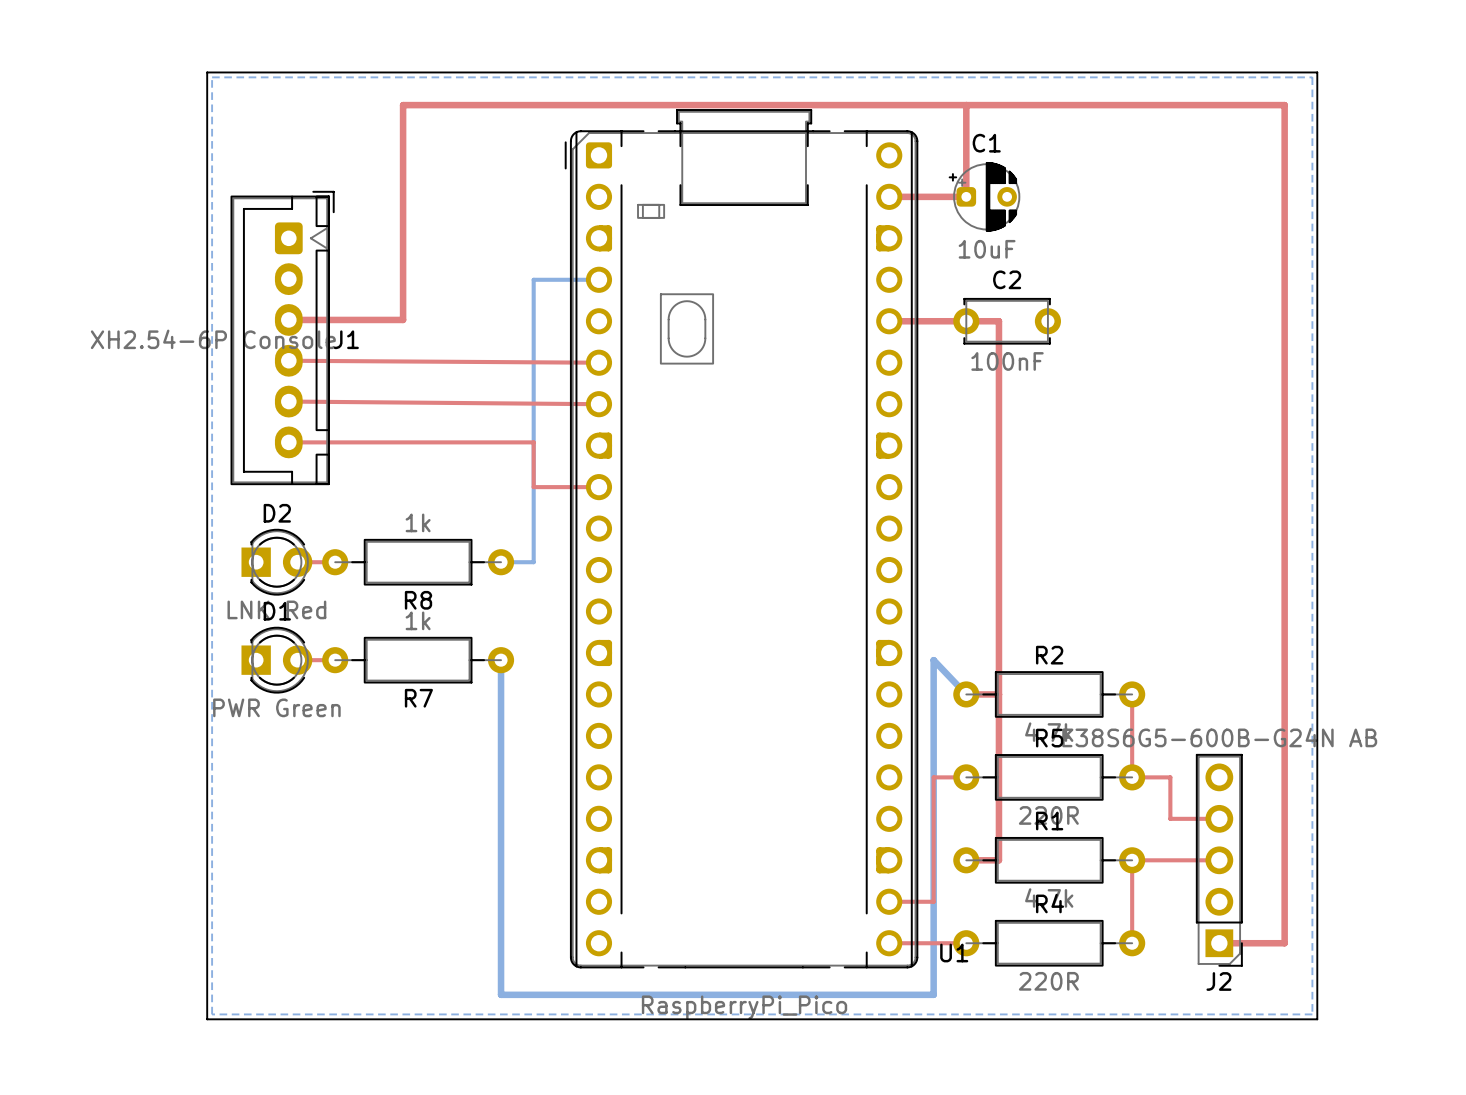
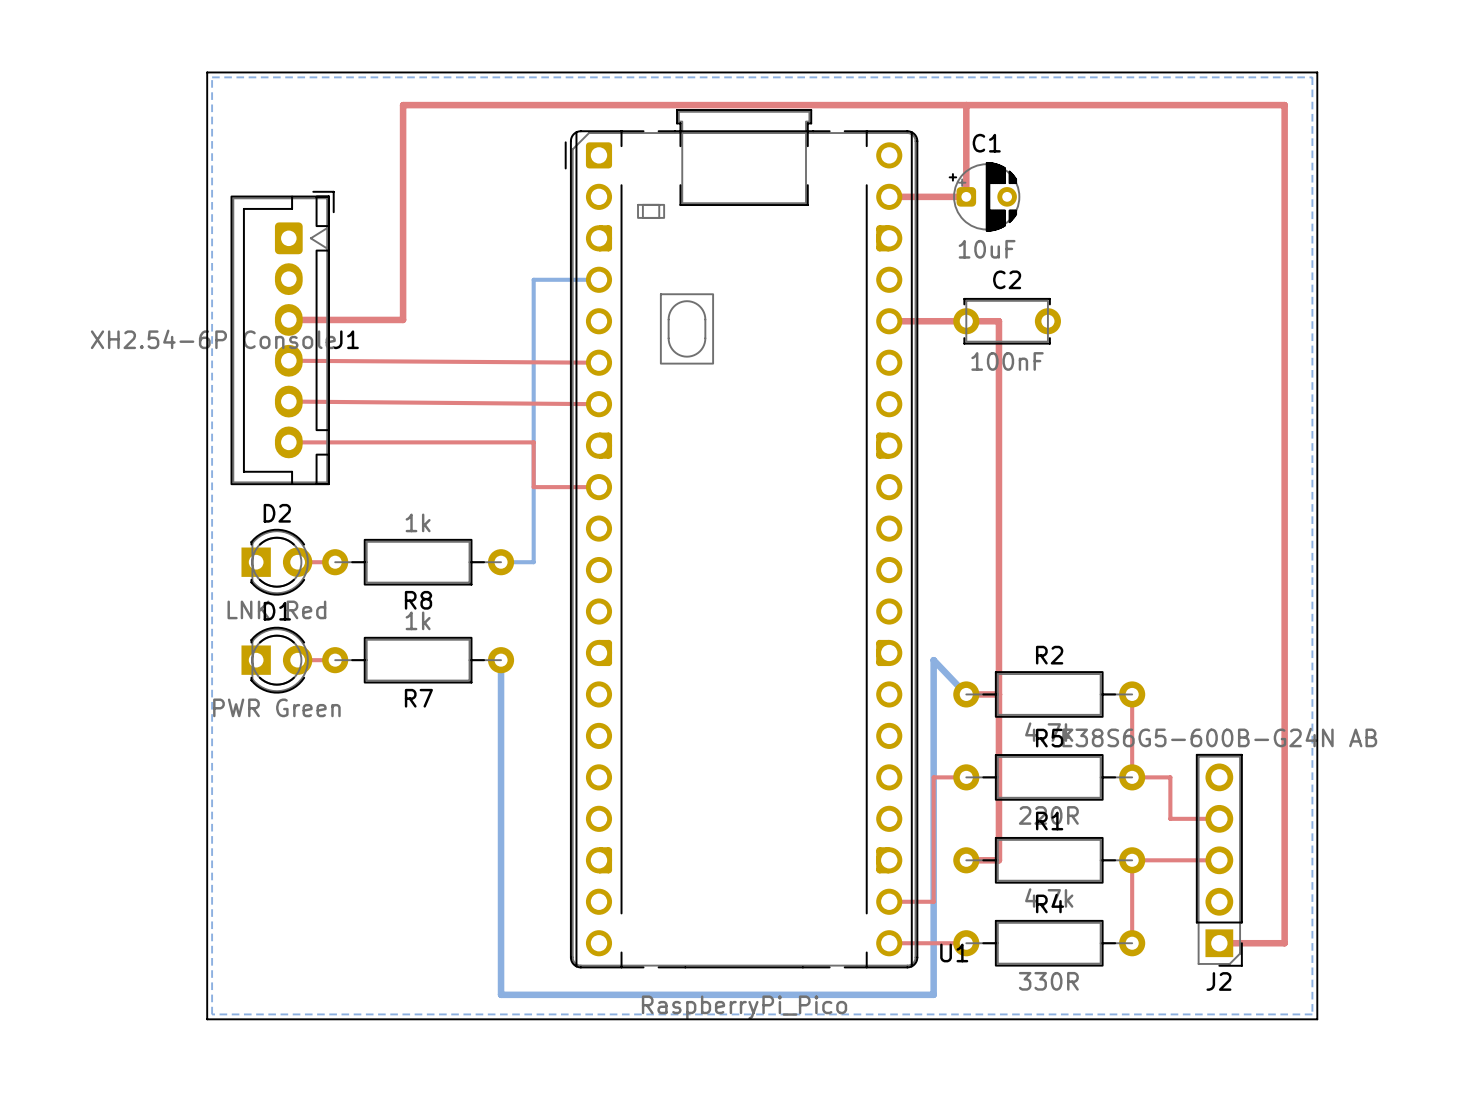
R4 value: 220R (1048, 981) -> 330R (1048, 981)

